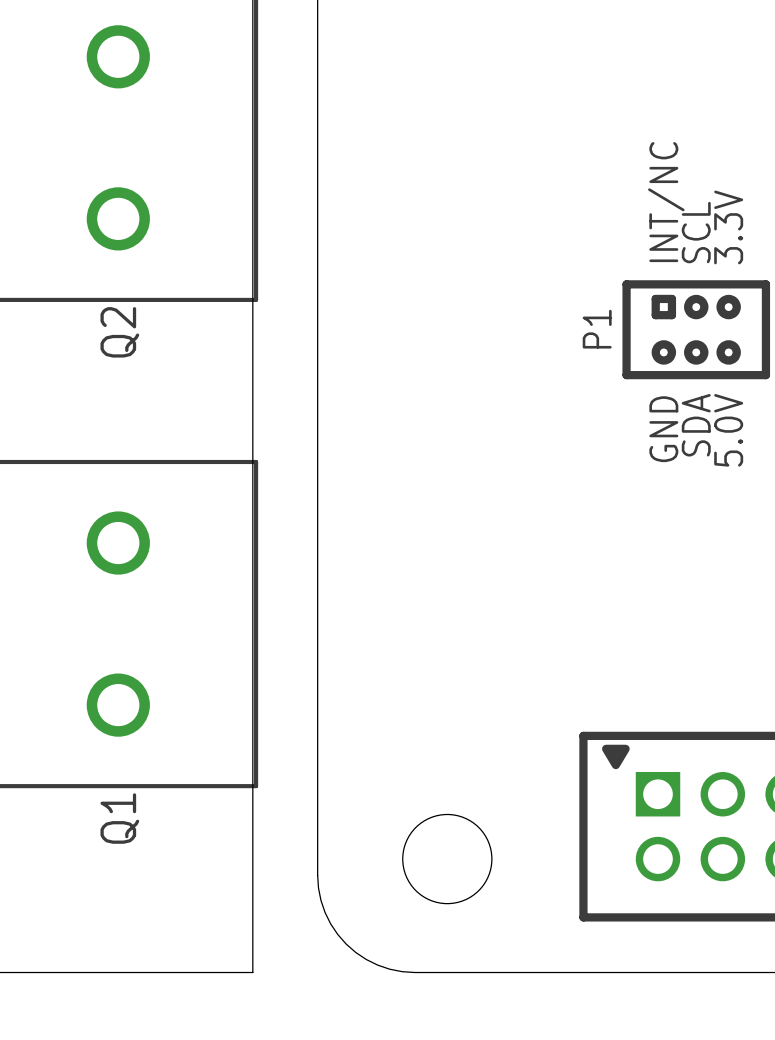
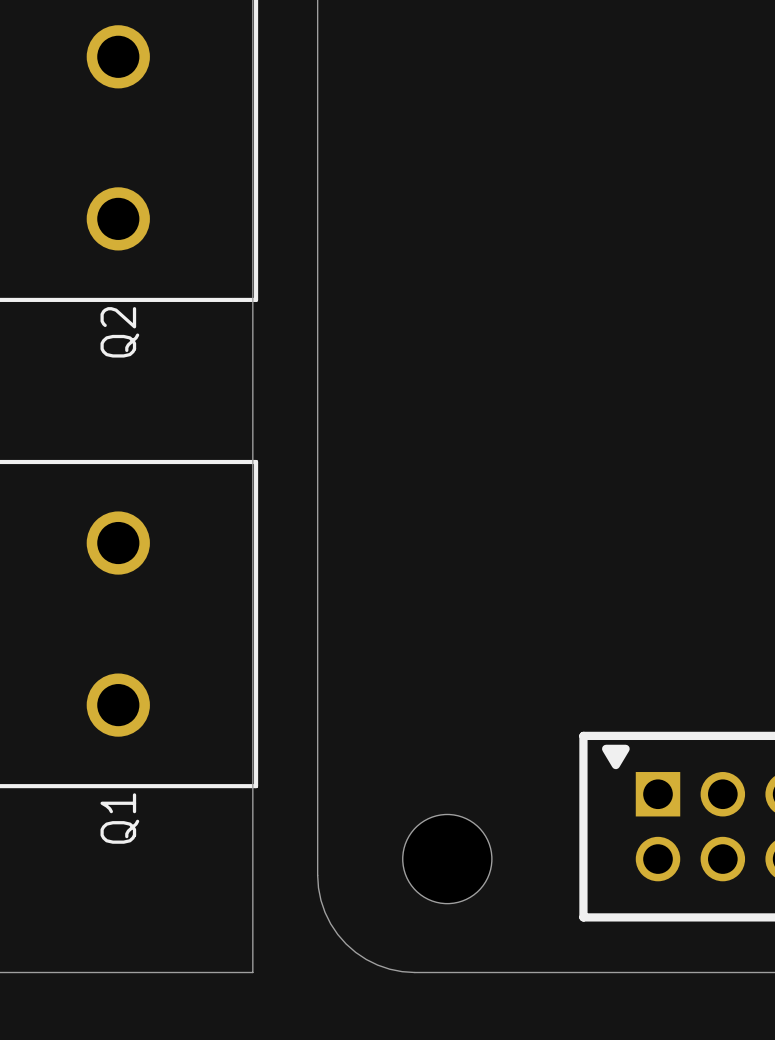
text: INT/NC (666, 202) -> none
text: 3.3V (728, 227) -> none
text: SCL (696, 232) -> none
line: (626, 284) (765, 284) (765, 375) (626, 375) (626, 284) -> none
drawing: [651, 294, 741, 365] -> none
line: (655, 298) (671, 298) (671, 315) (655, 315) (655, 298) -> none
text: P1 (597, 329) -> none
text: SDA (696, 425) -> none
text: GND (663, 429) -> none
text: 5.0V (728, 430) -> none

